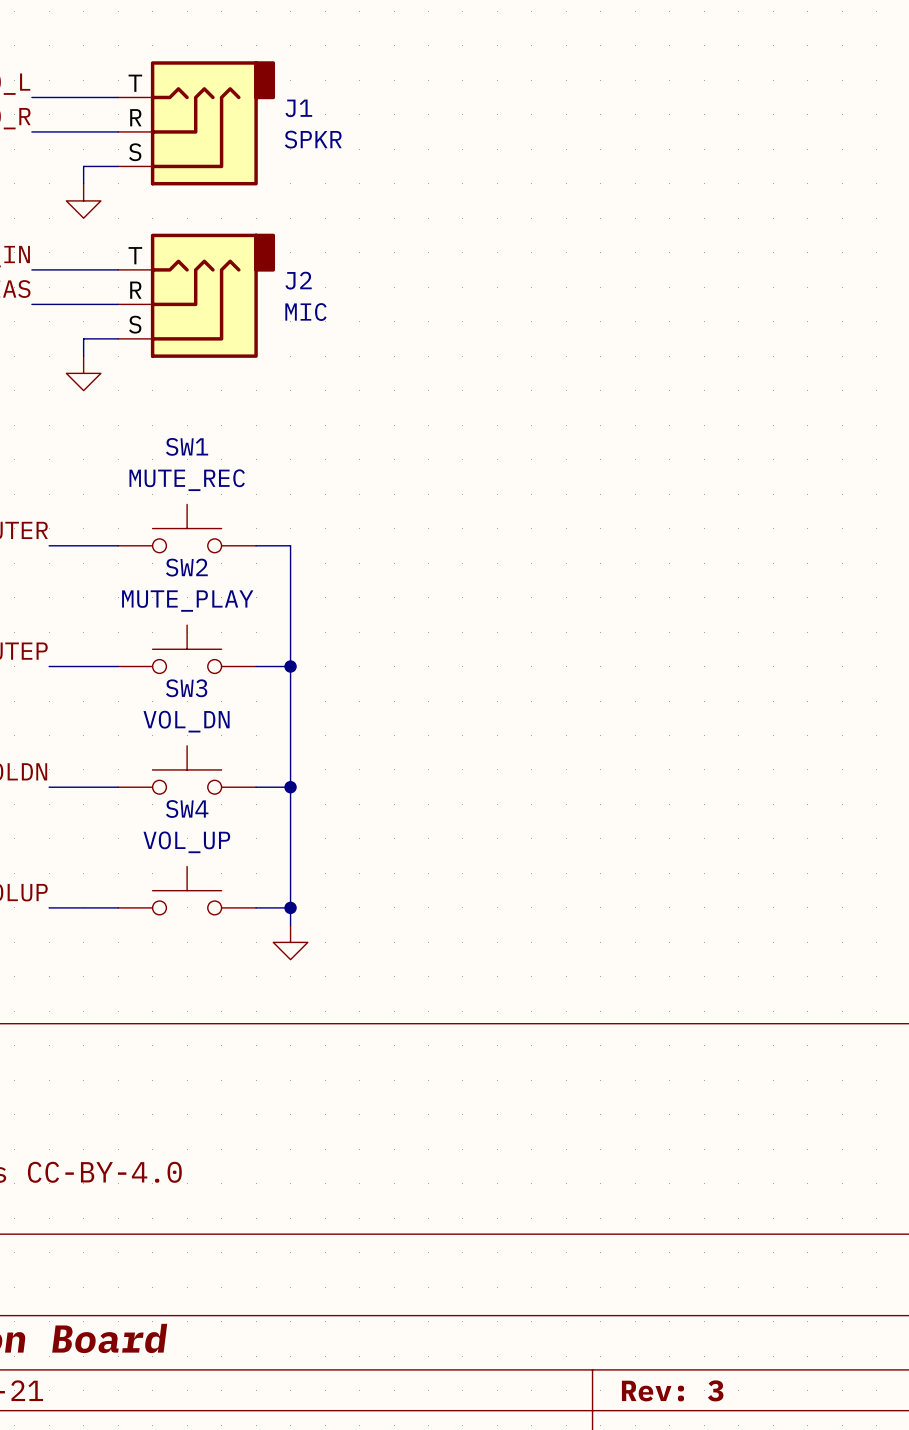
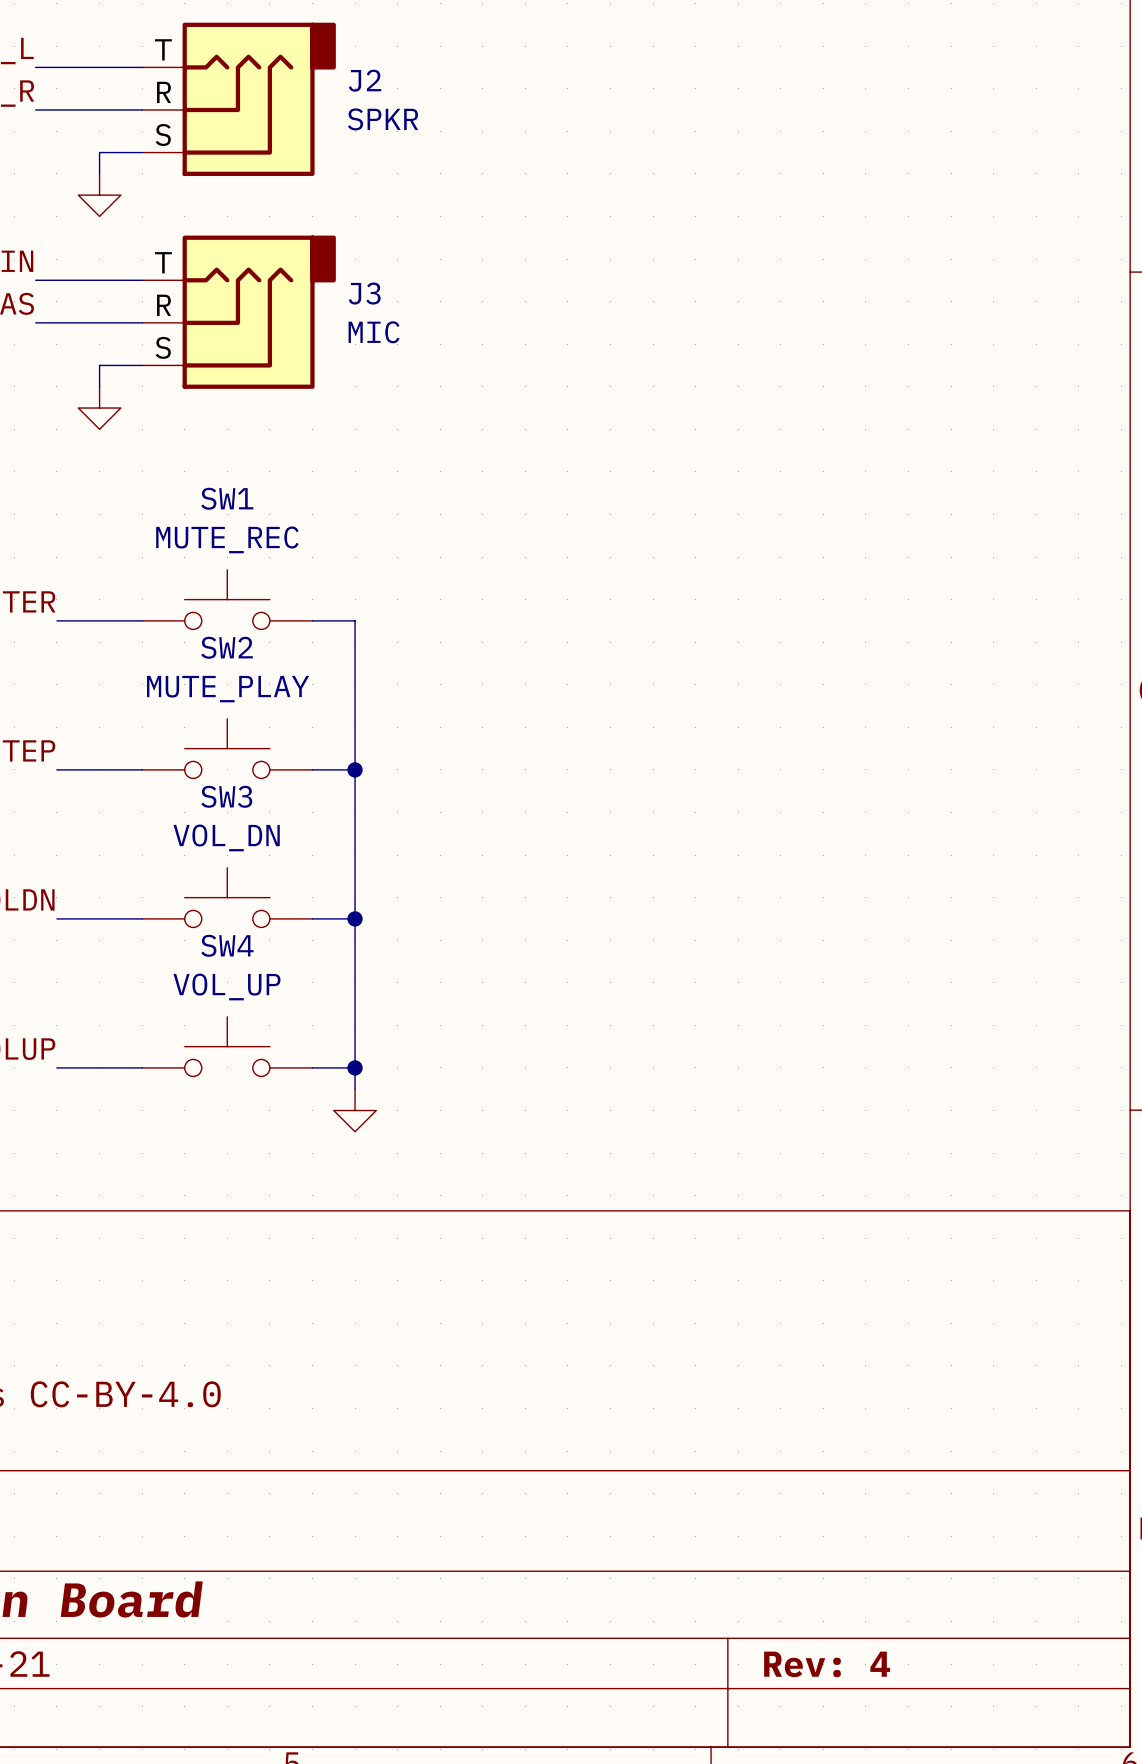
J1 name: J1 (298, 108) -> J2 (364, 80)
J2 name: J2 (298, 280) -> J3 (364, 293)
title block: Rev: 3 (672, 1390) -> Rev: 4 (827, 1664)

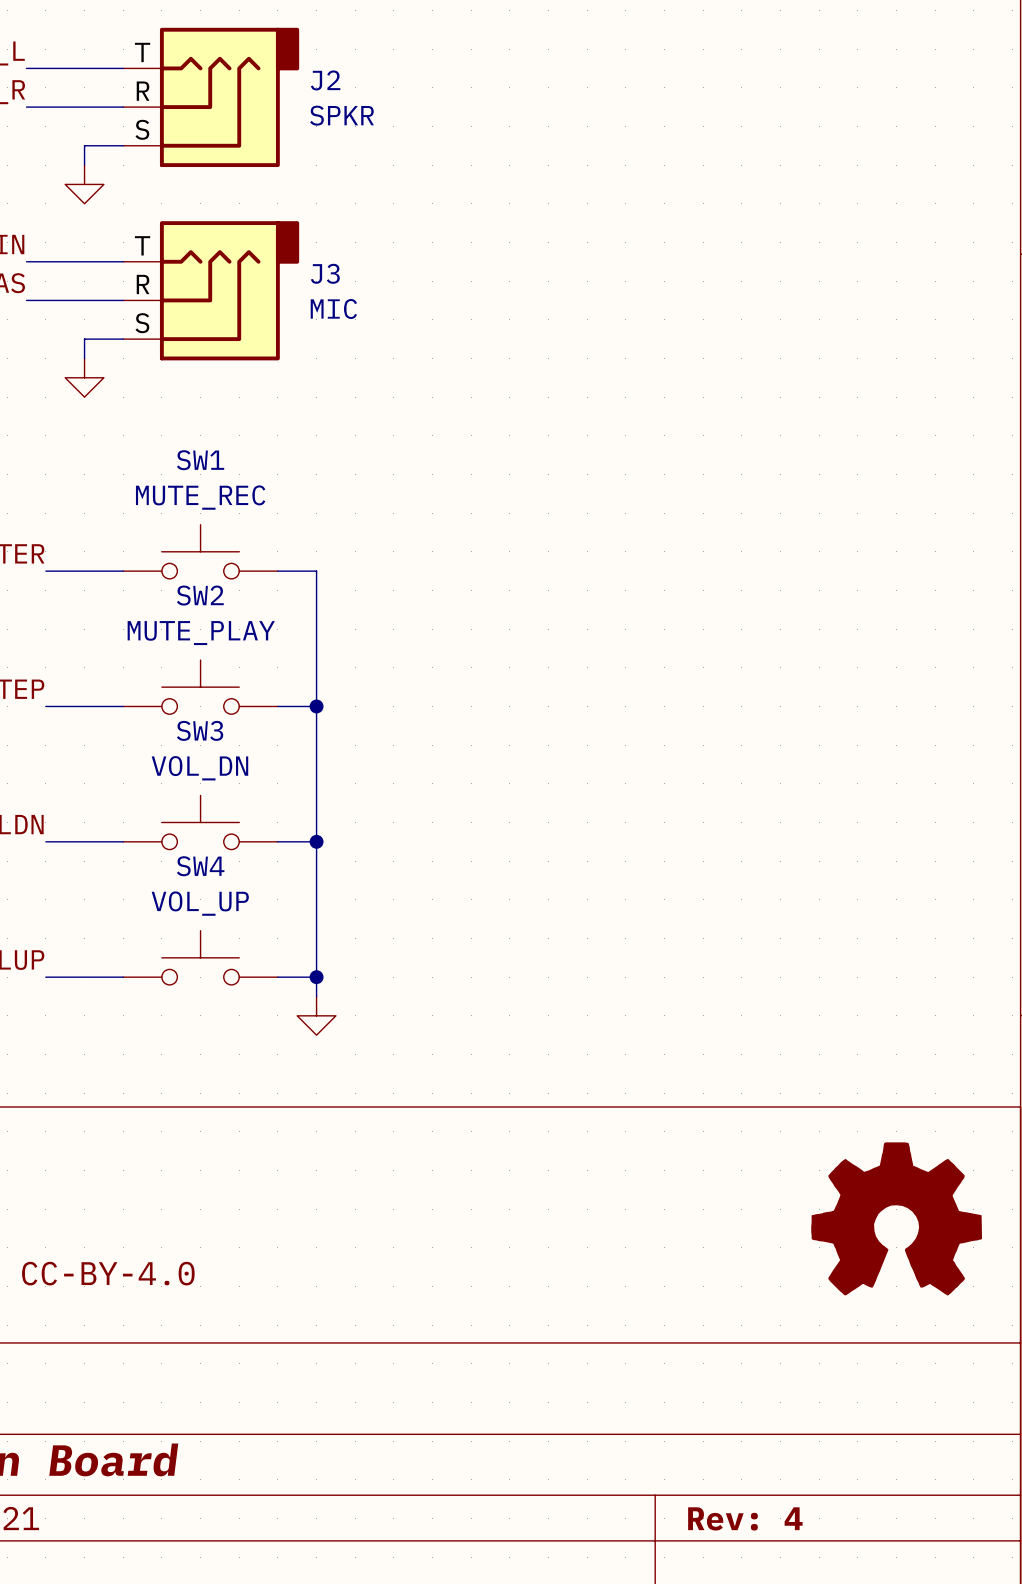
part: none -> (896, 1218)

